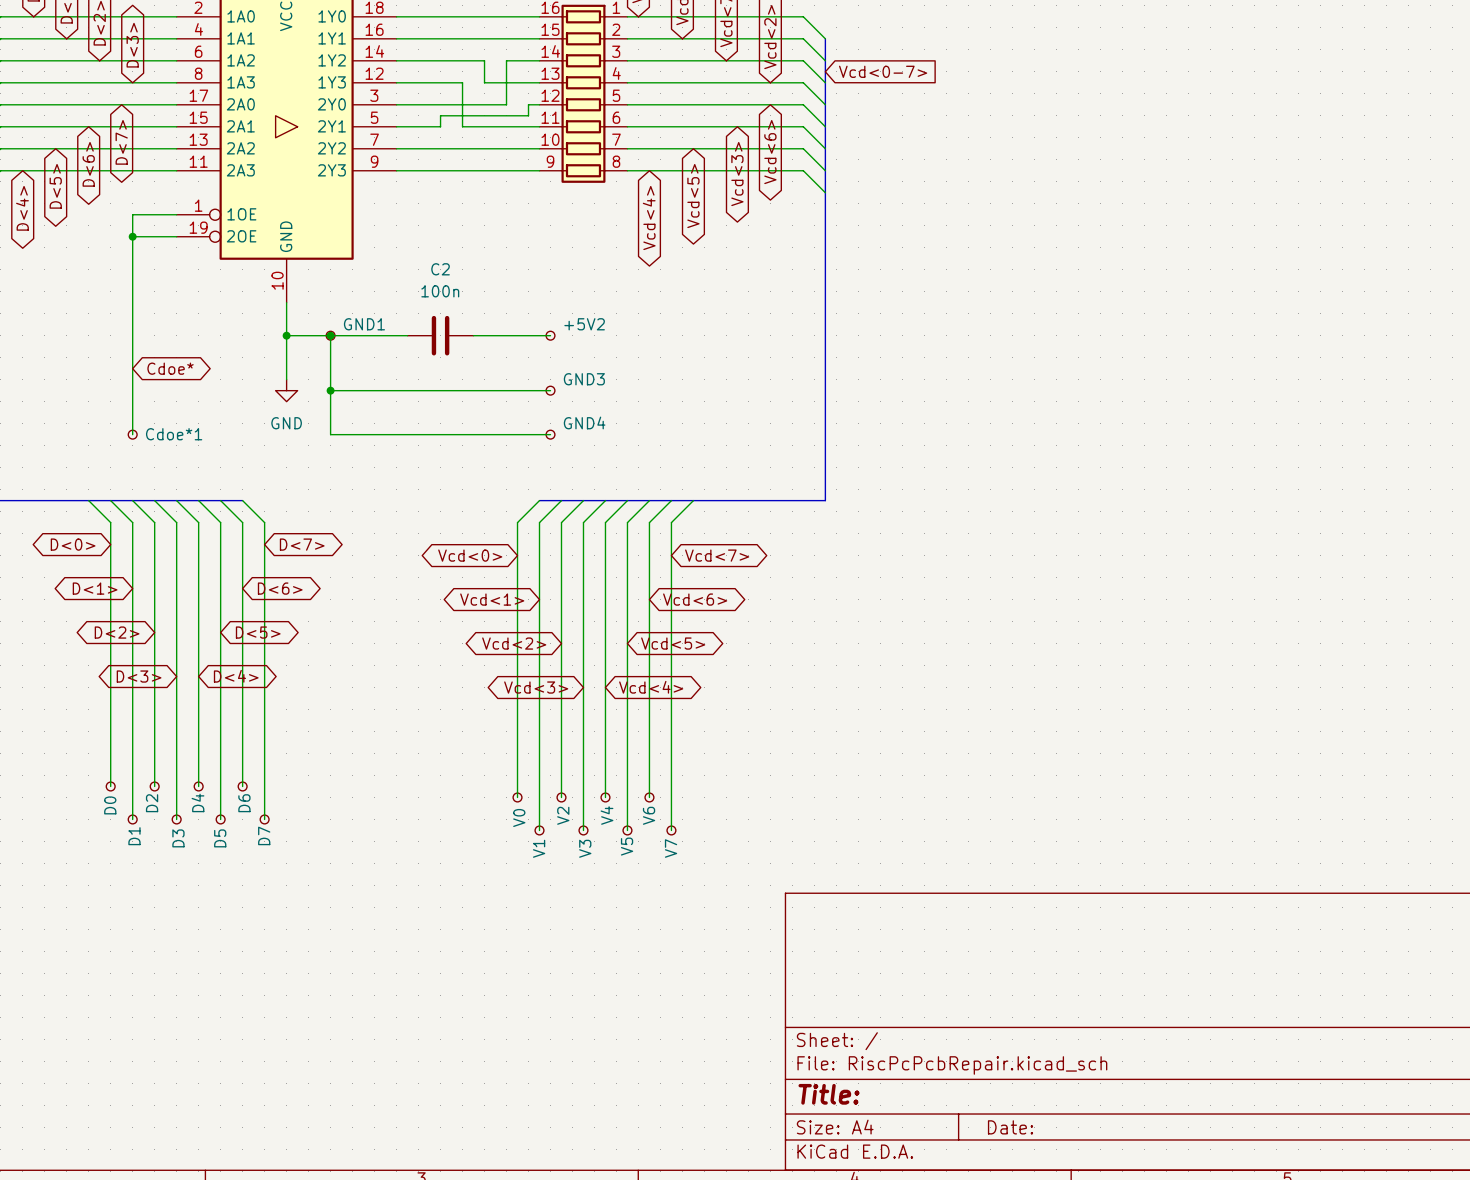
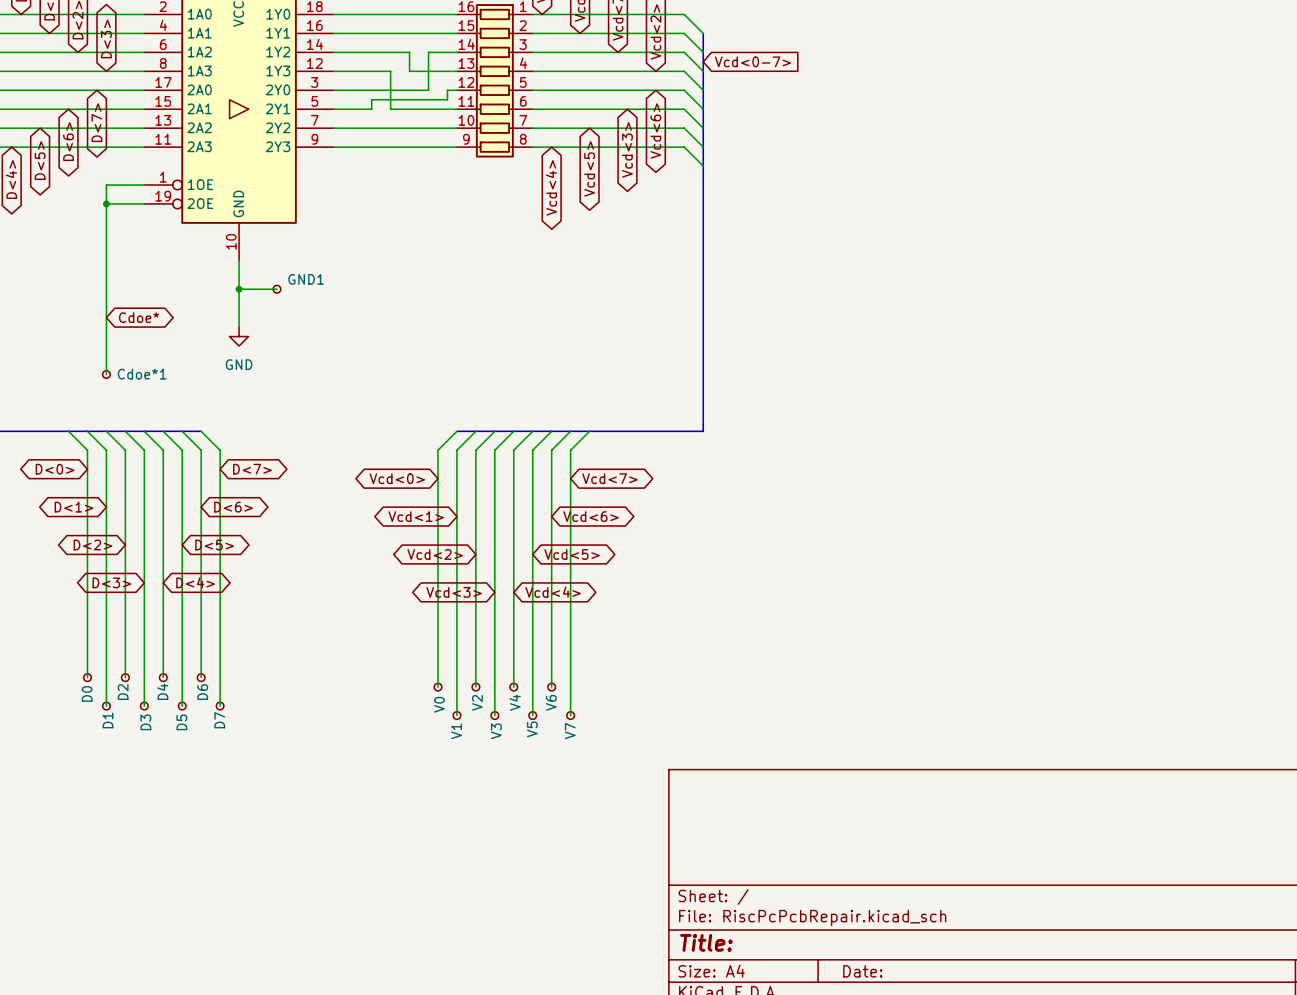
junction: (330, 335) -> none
wire: (407, 335) (330, 335) (330, 434) (550, 434) -> none
C2: 100n (440, 335) -> none
wire: (473, 335) (550, 335) -> none
+5V2: (550, 335) -> none
wire: (330, 390) (550, 390) -> none
junction: (330, 390) -> none
GND3: (550, 390) -> none
GND4: (550, 434) -> none

